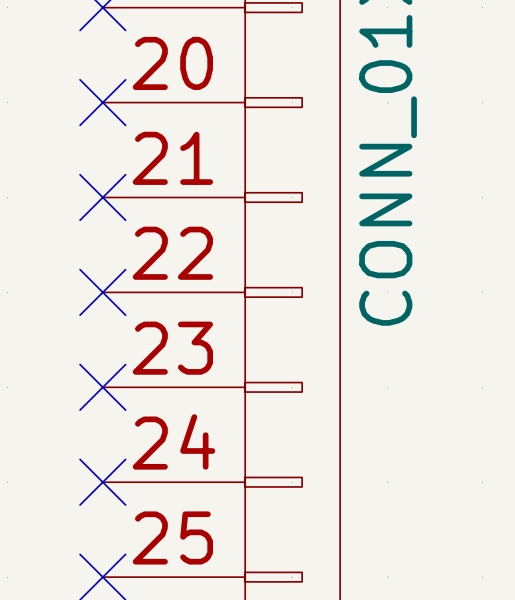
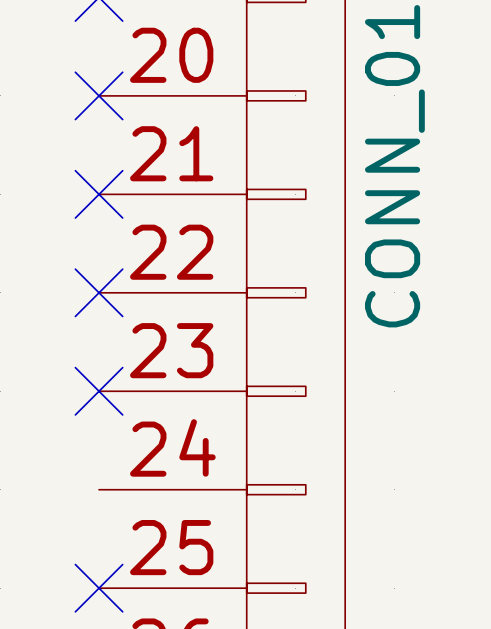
no-connect mark: (102, 482) -> none

